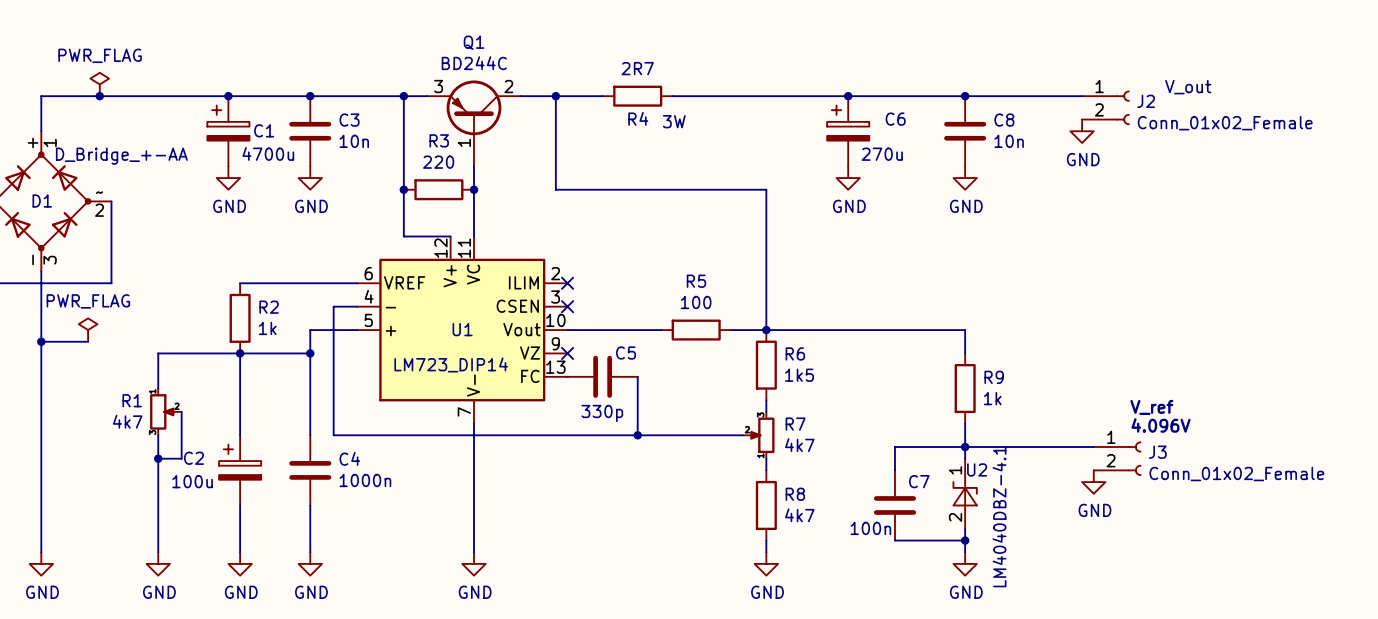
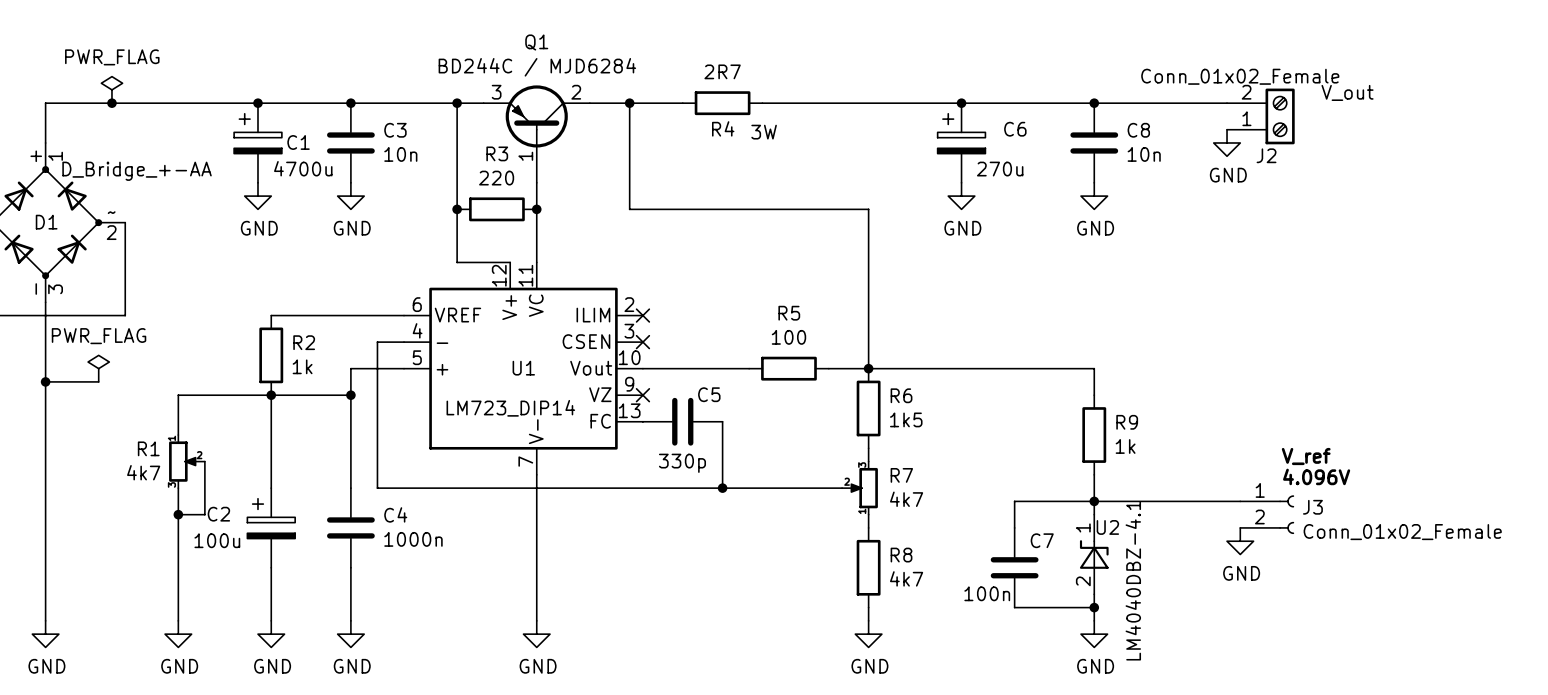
Q1 value: BD244C (474, 63) -> BD244C / MJD6284 (537, 67)
J2 symbol: [1082, 90, 1130, 125] -> [1227, 88, 1295, 145]
J2 name position: J2 (1146, 101) -> J2 (1266, 155)
J2 value position: Conn_01x02_Female (1225, 123) -> Conn_01x02_Female (1240, 76)

